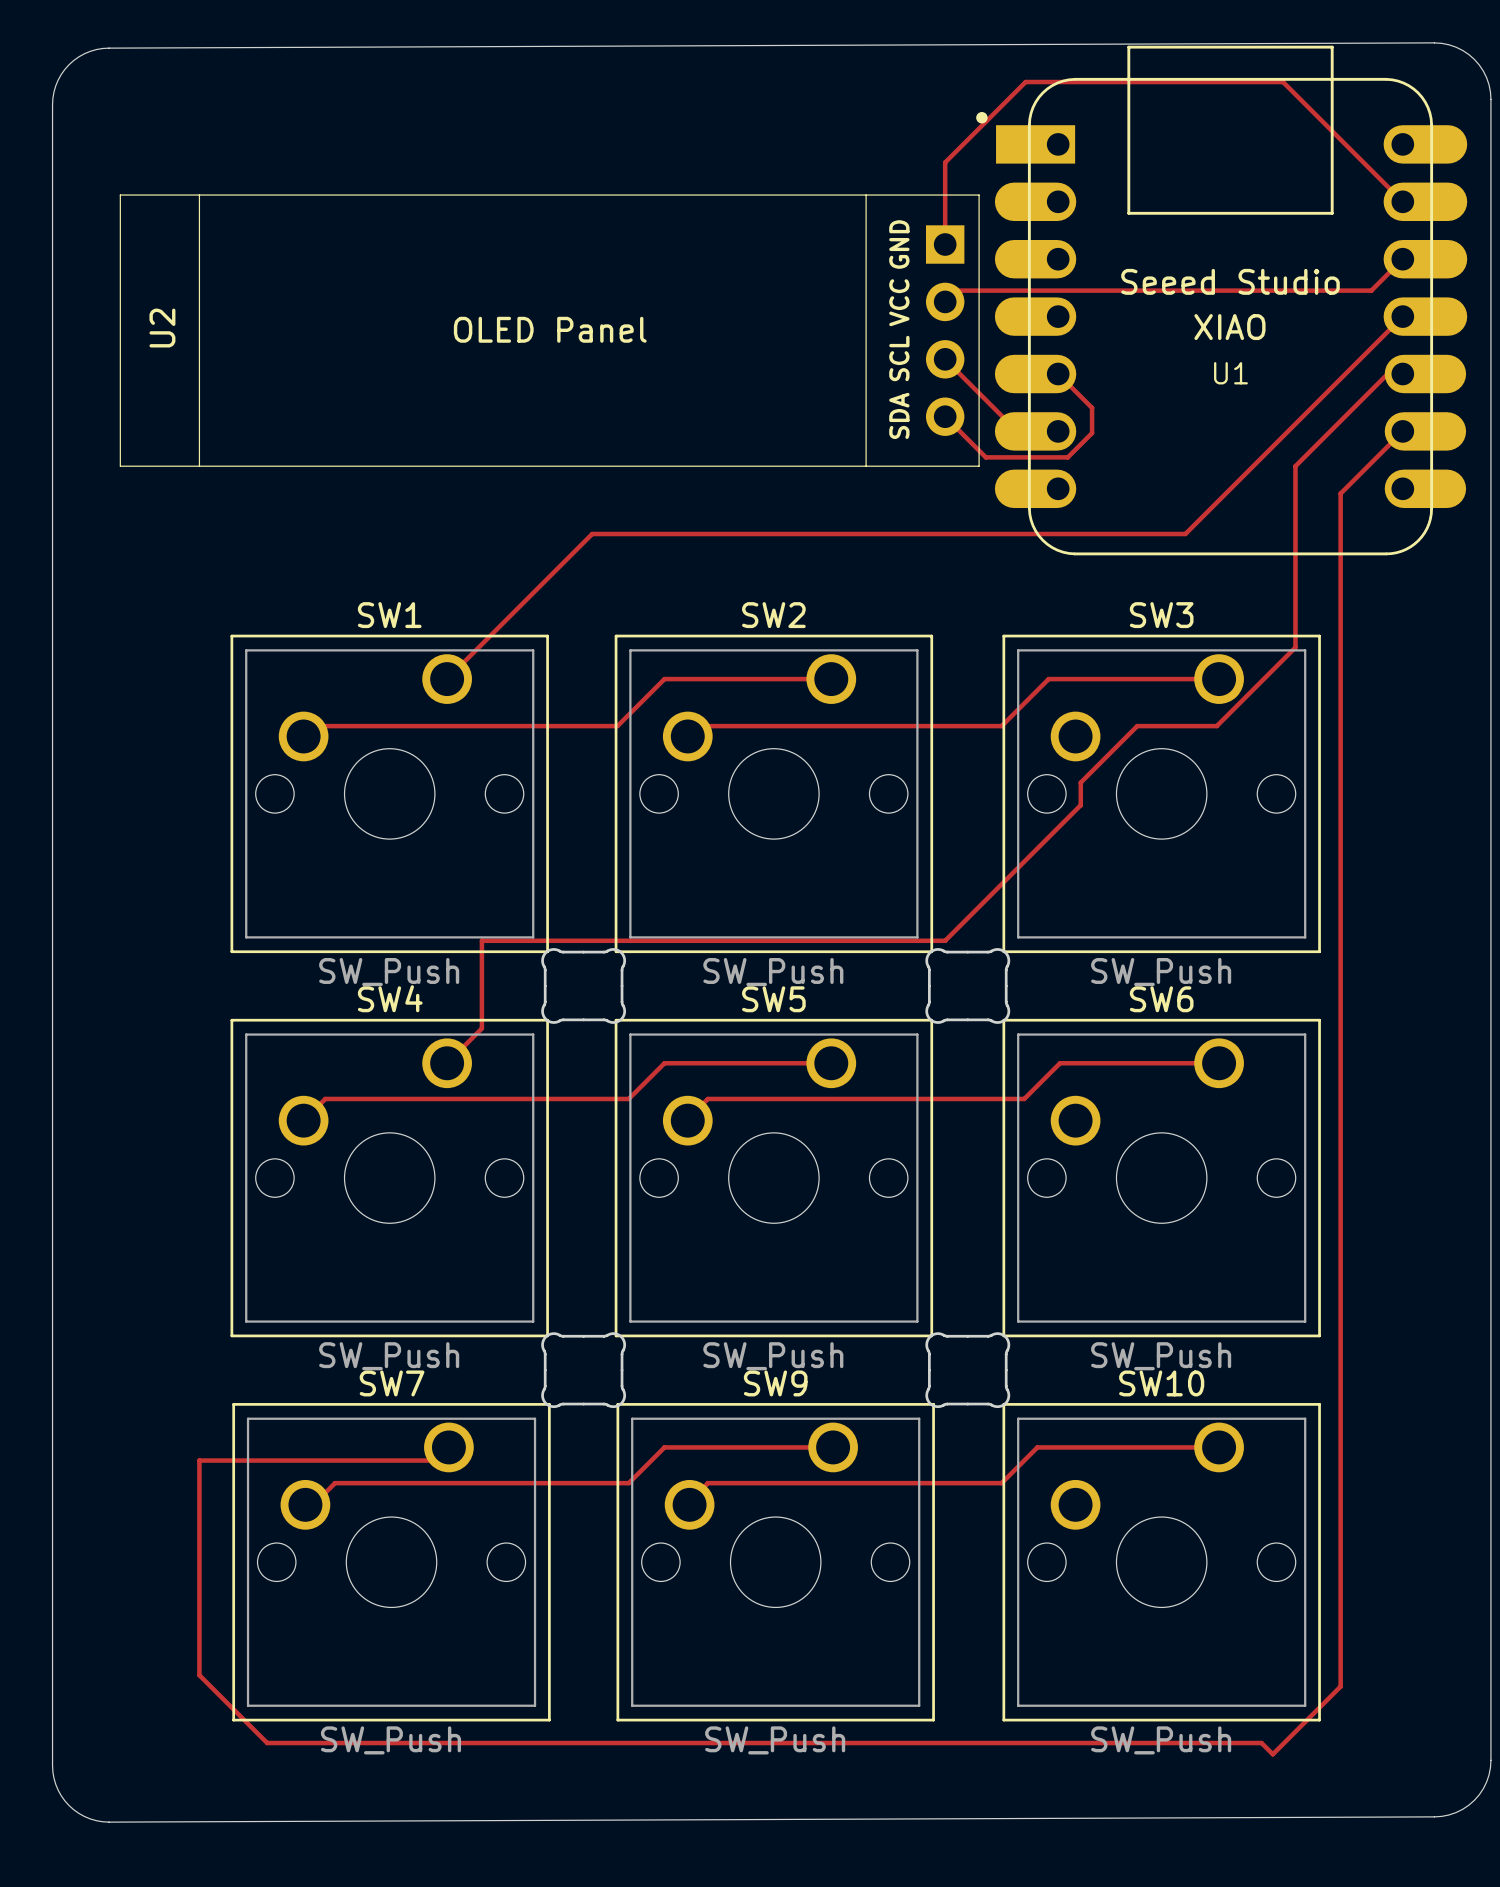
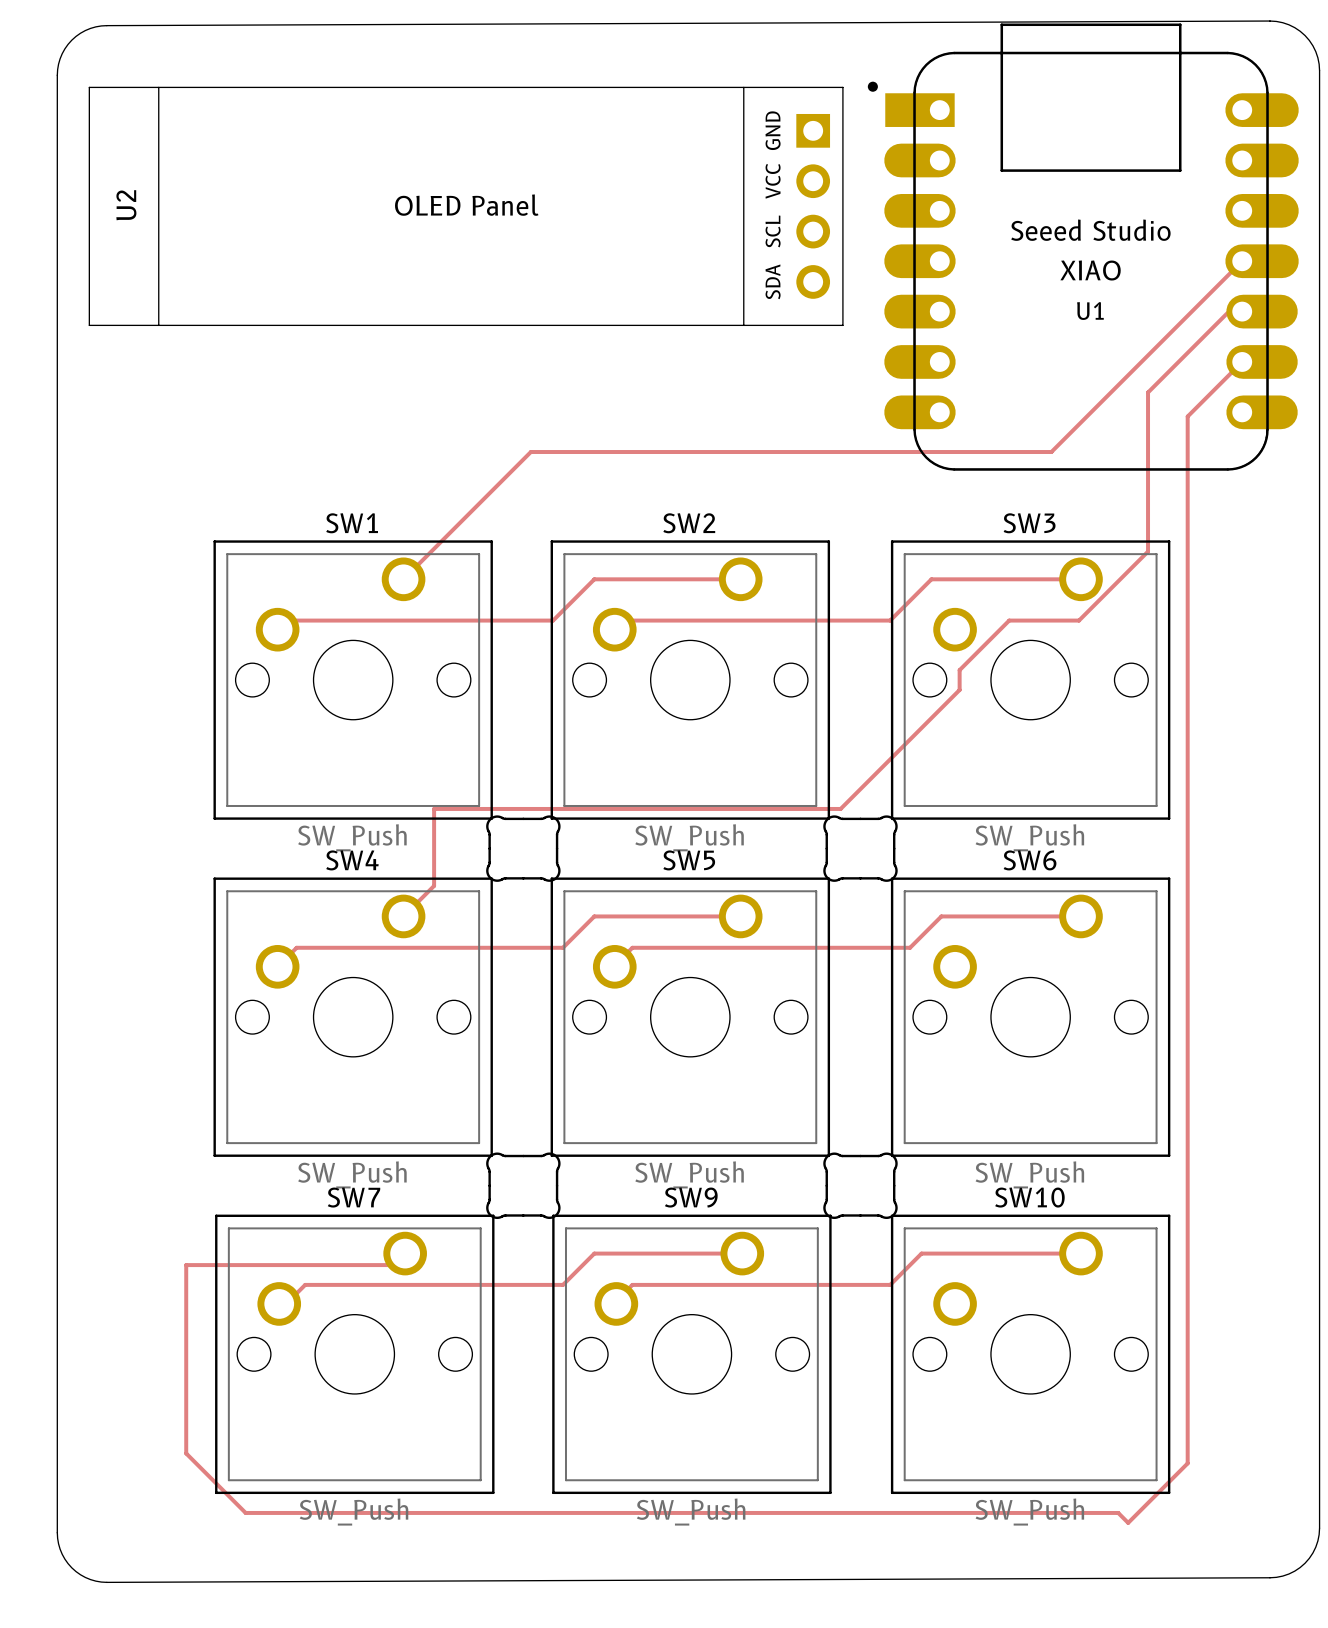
track: (1402, 201) (1283, 82) (1025, 82) (945, 162) (945, 244) -> none
track: (1402, 259) (1371, 290) (956, 290) (945, 301) -> none
U2 position: (549, 330) -> (466, 206)
track: (945, 359) (1017, 431) (1058, 431) -> none
track: (1058, 374) (1092, 407) (1092, 433) (1067, 457) (985, 457) (945, 416) -> none

